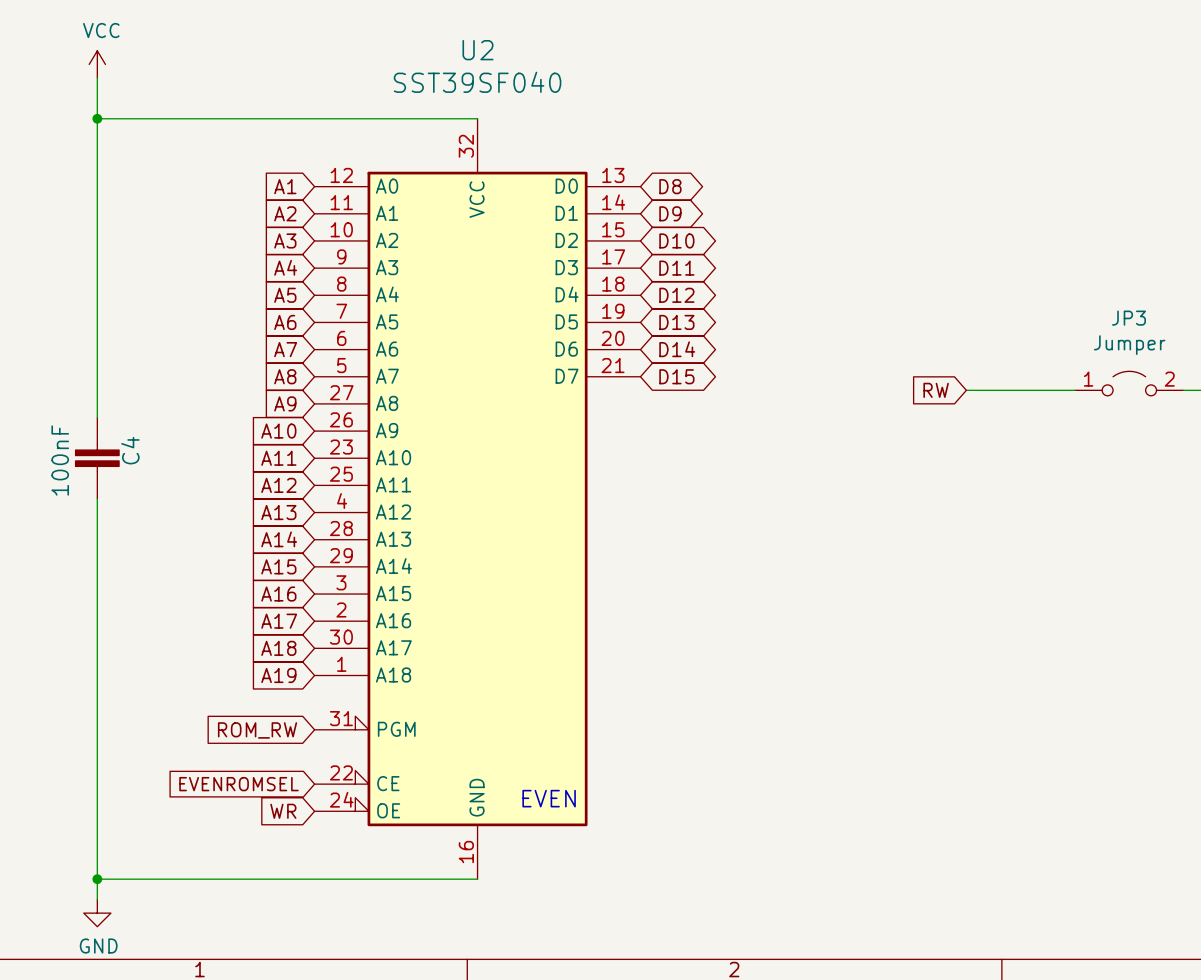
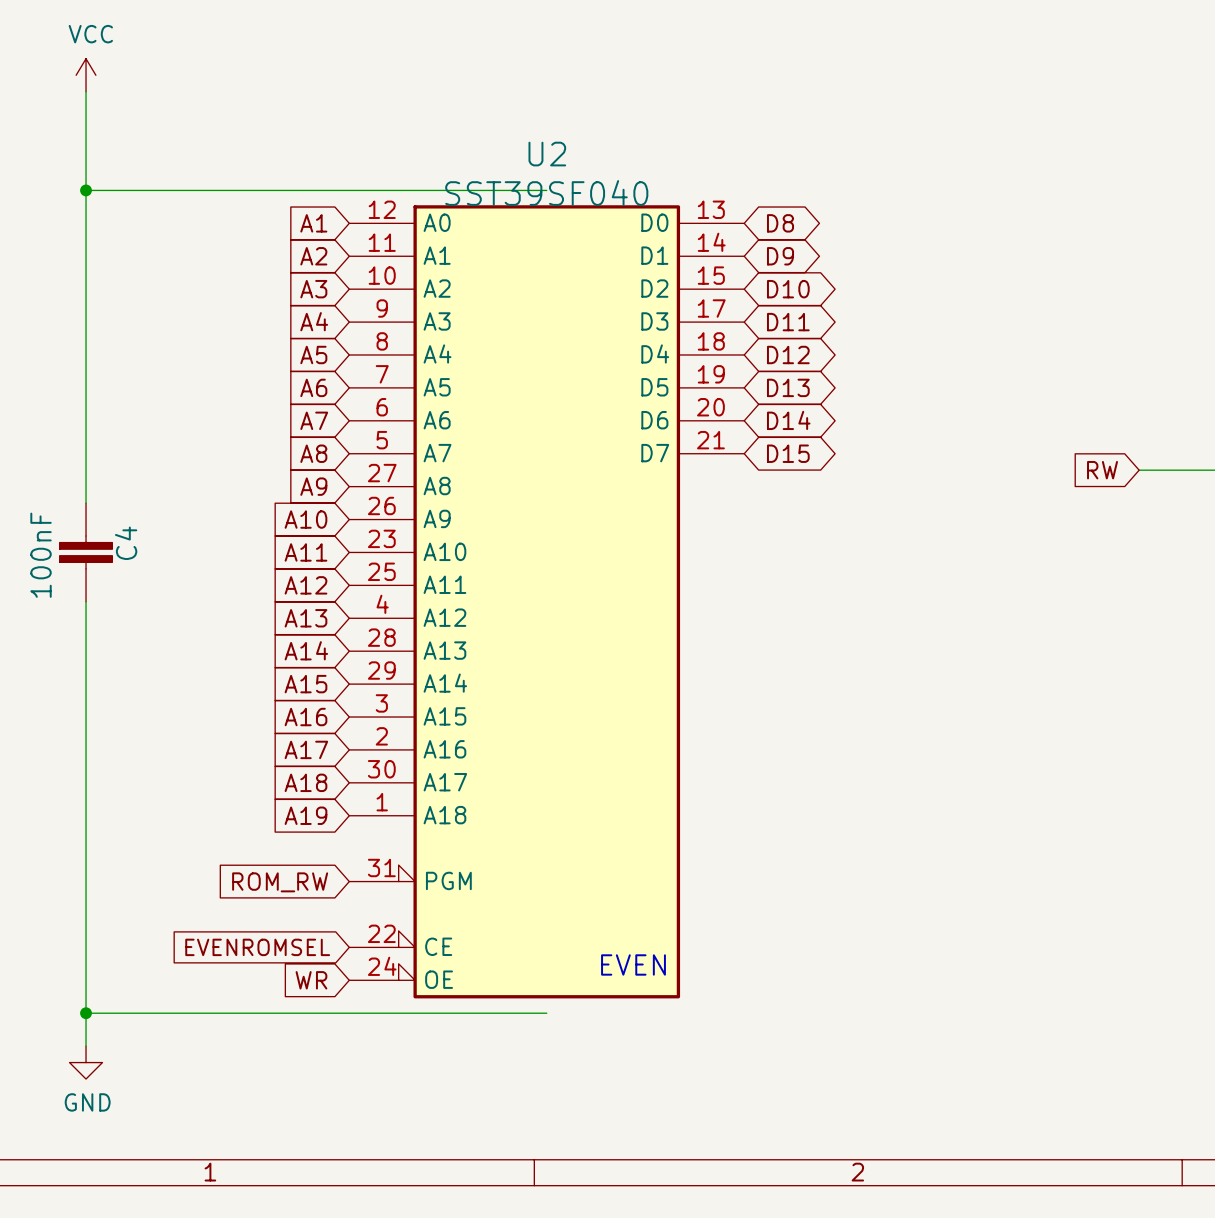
U2 name position: U2 (477, 50) -> U2 (547, 154)
U2 value position: SST39SF040 (477, 82) -> SST39SF040 (546, 192)
wire: (97, 118) (477, 118) -> (86, 190) (546, 190)
junction position: (97, 118) -> (86, 190)
U2 symbol: [314, 118, 641, 880] -> [349, 205, 745, 999]
wire: (97, 865) (97, 899) -> none
wire: (97, 879) (477, 879) -> (86, 1013) (546, 1013)
junction position: (97, 879) -> (86, 1013)
power symbol position: GND (97, 913) -> GND (86, 1062)

